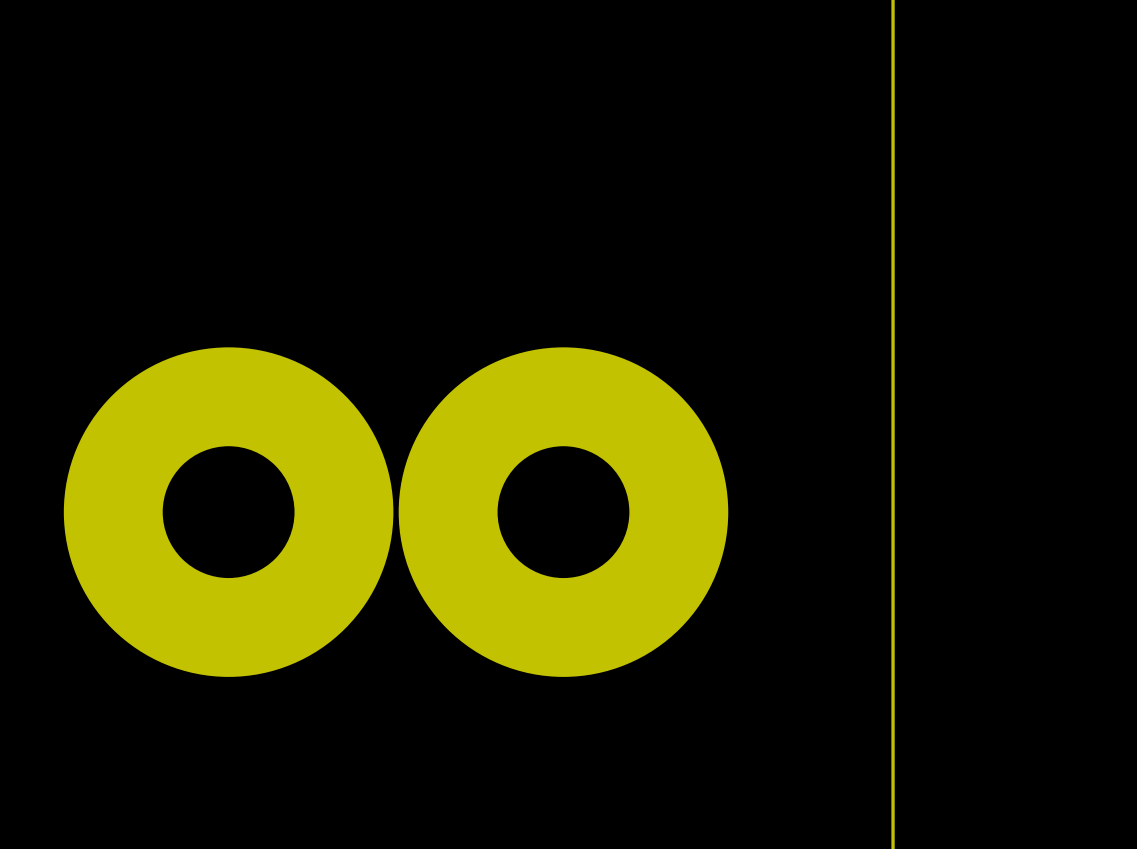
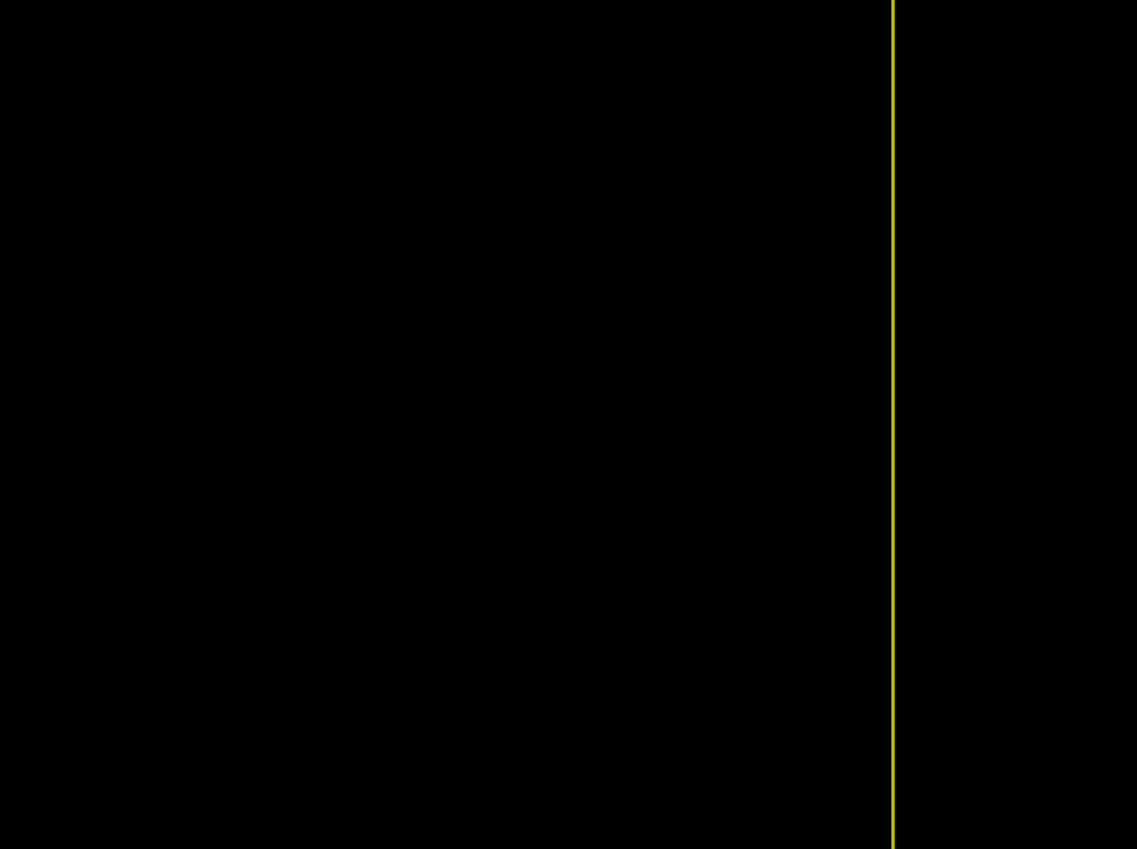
part: (396, 512) -> none

